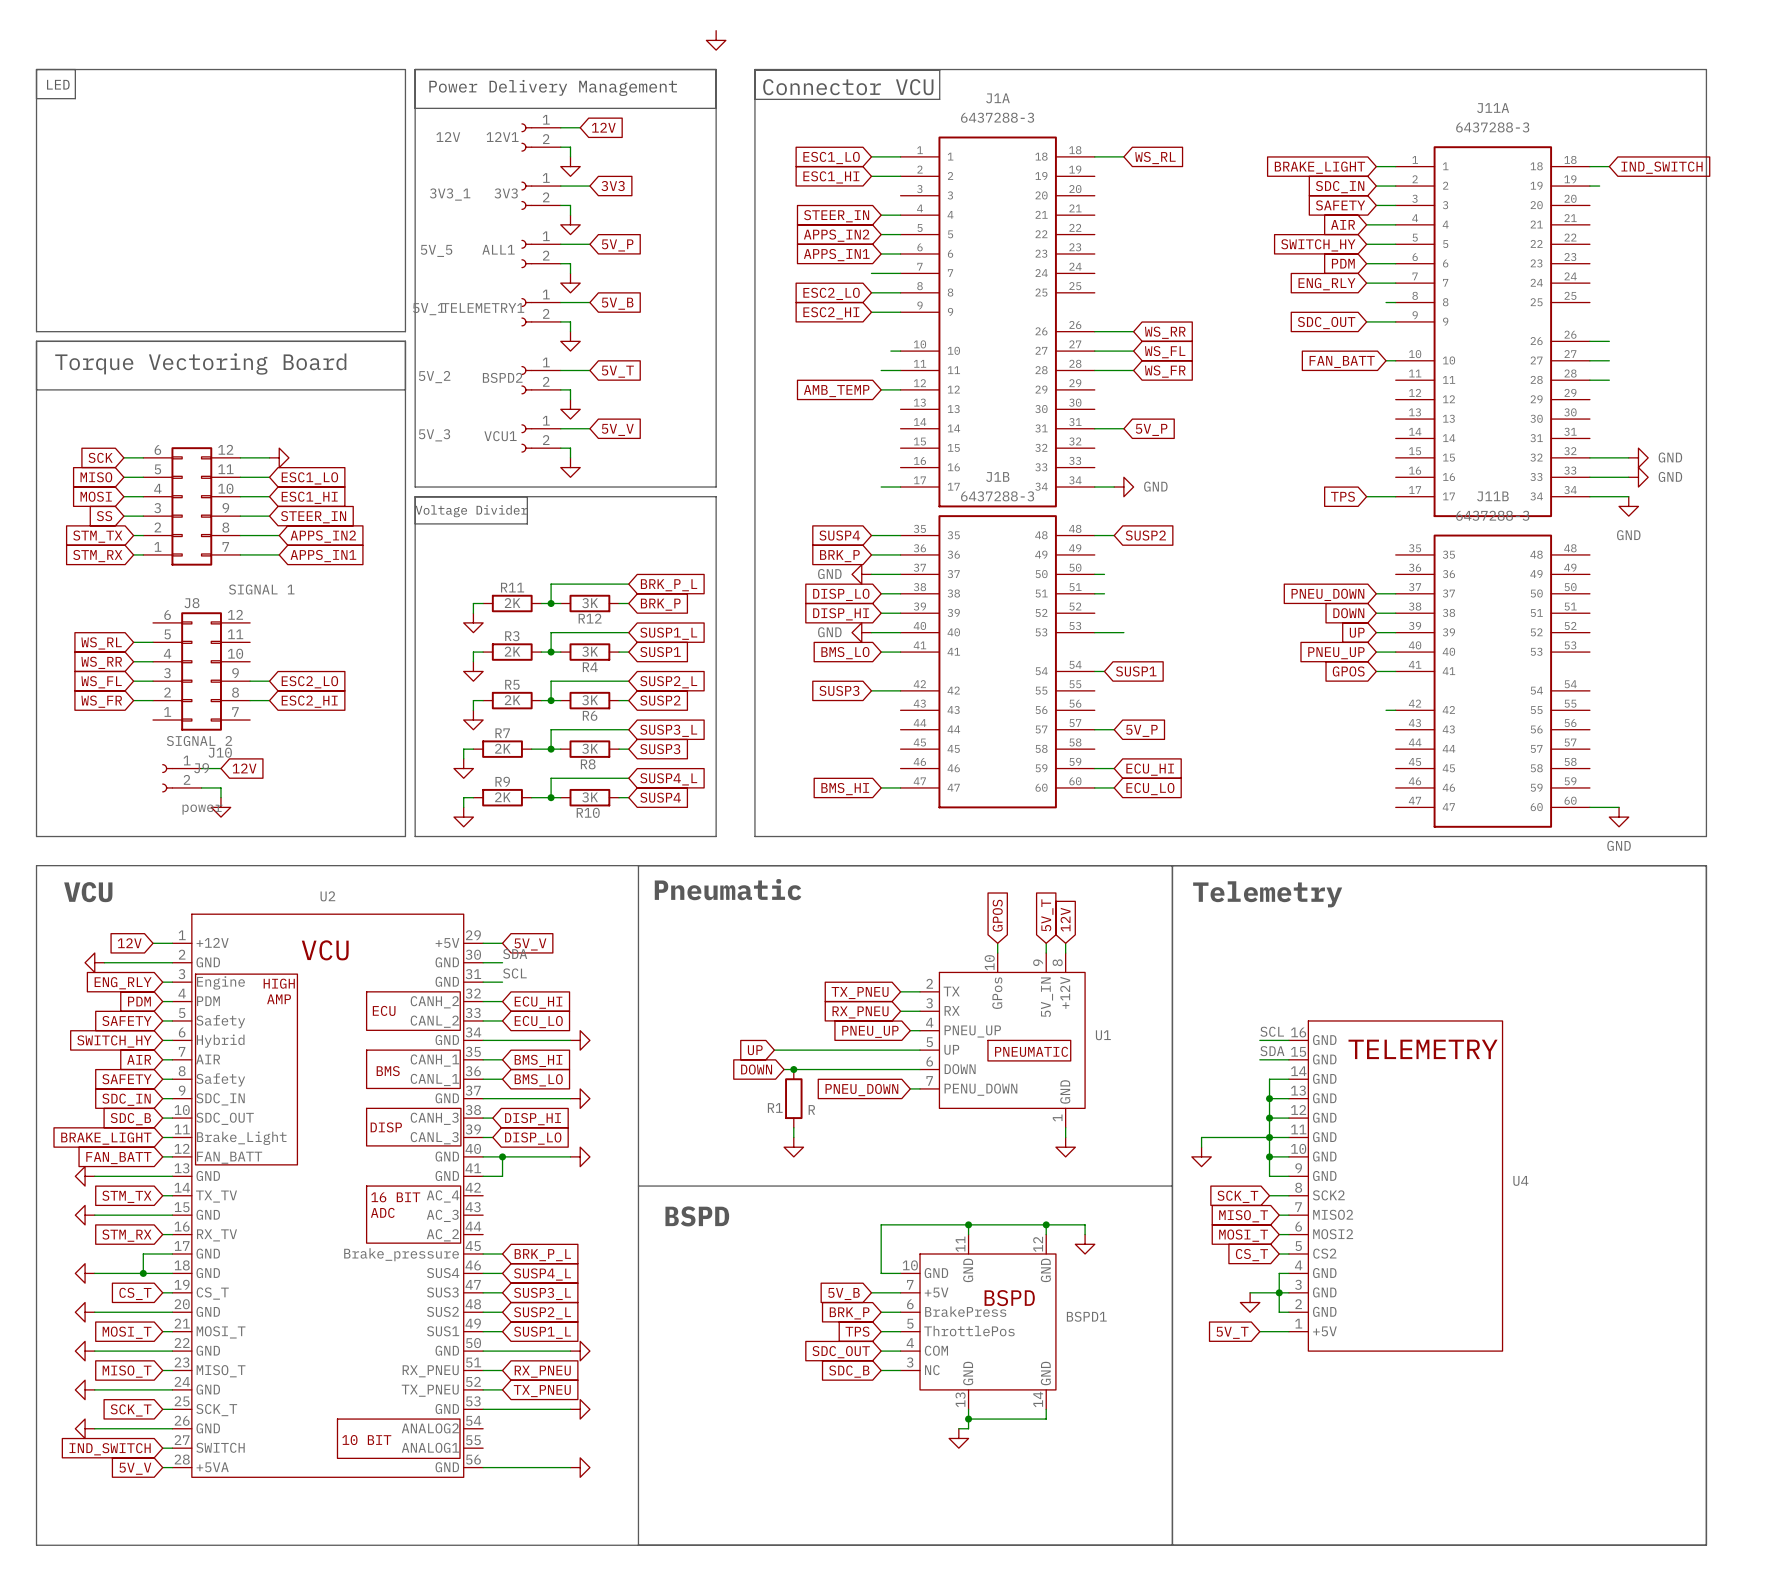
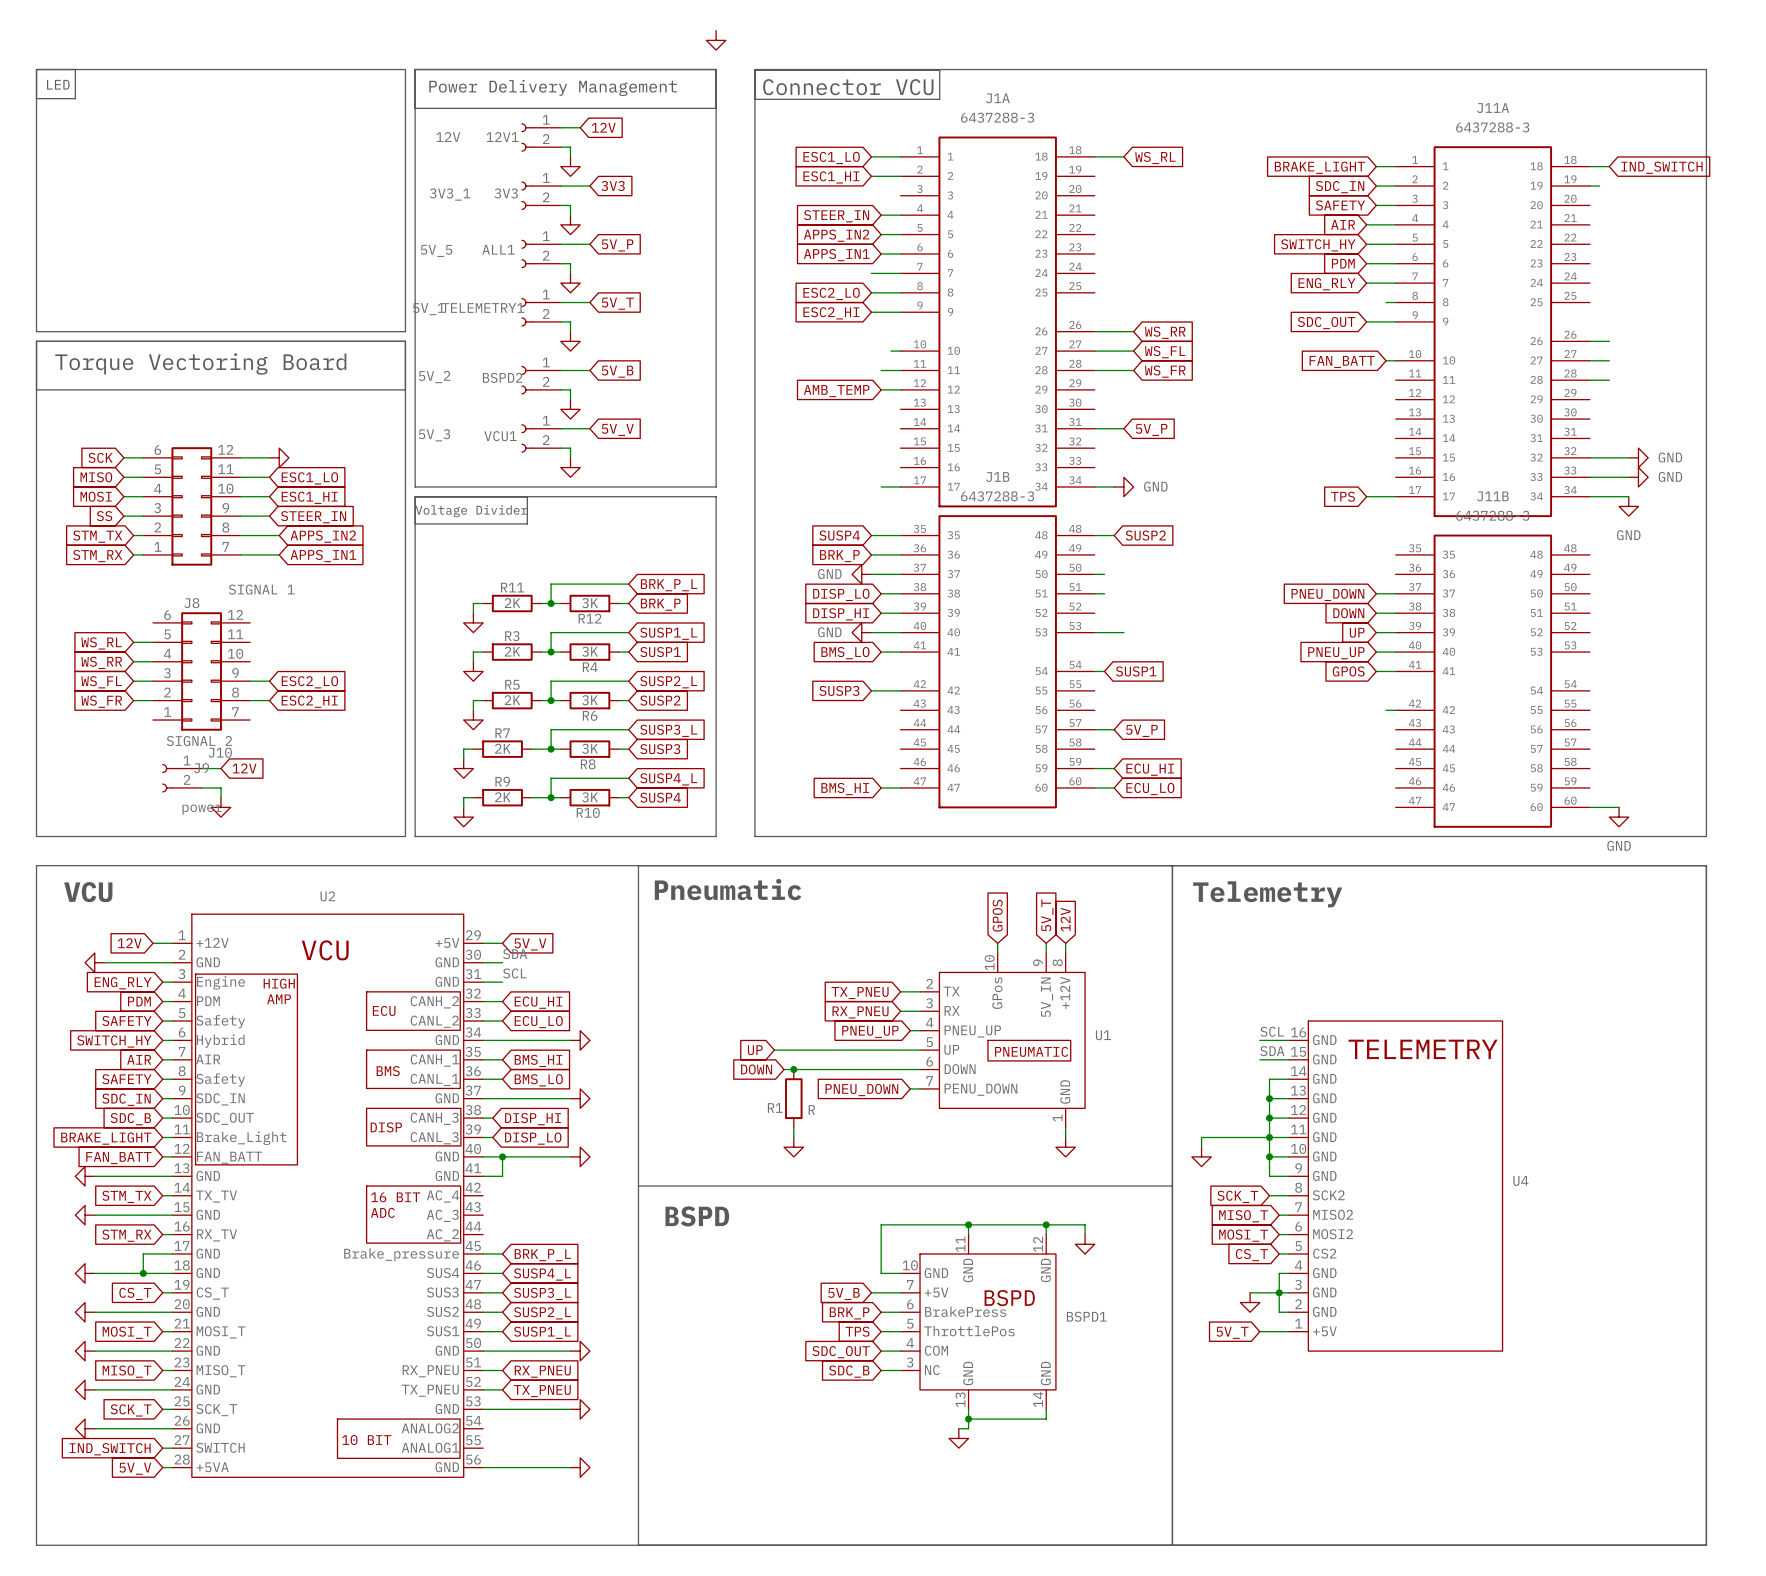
global label: 5V_B (617, 303) -> 5V_T (617, 303)
global label: 5V_T (617, 371) -> 5V_B (617, 371)

